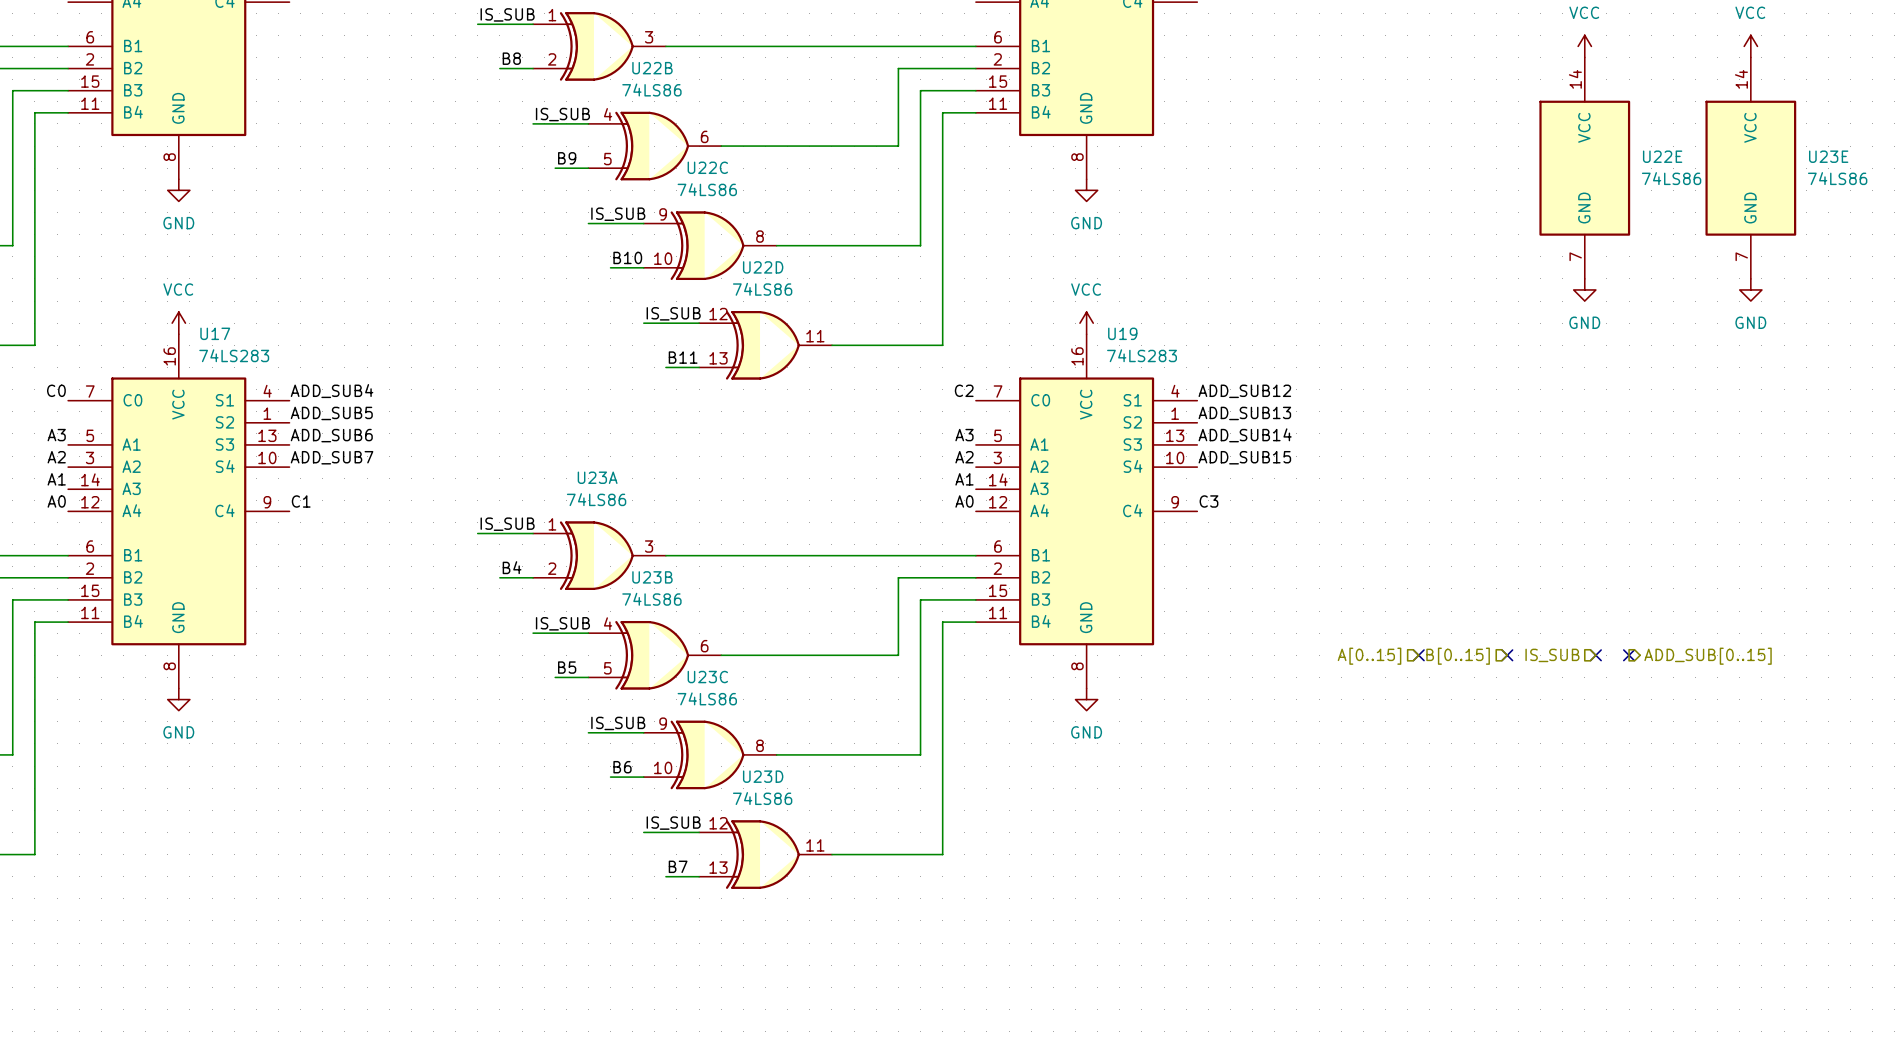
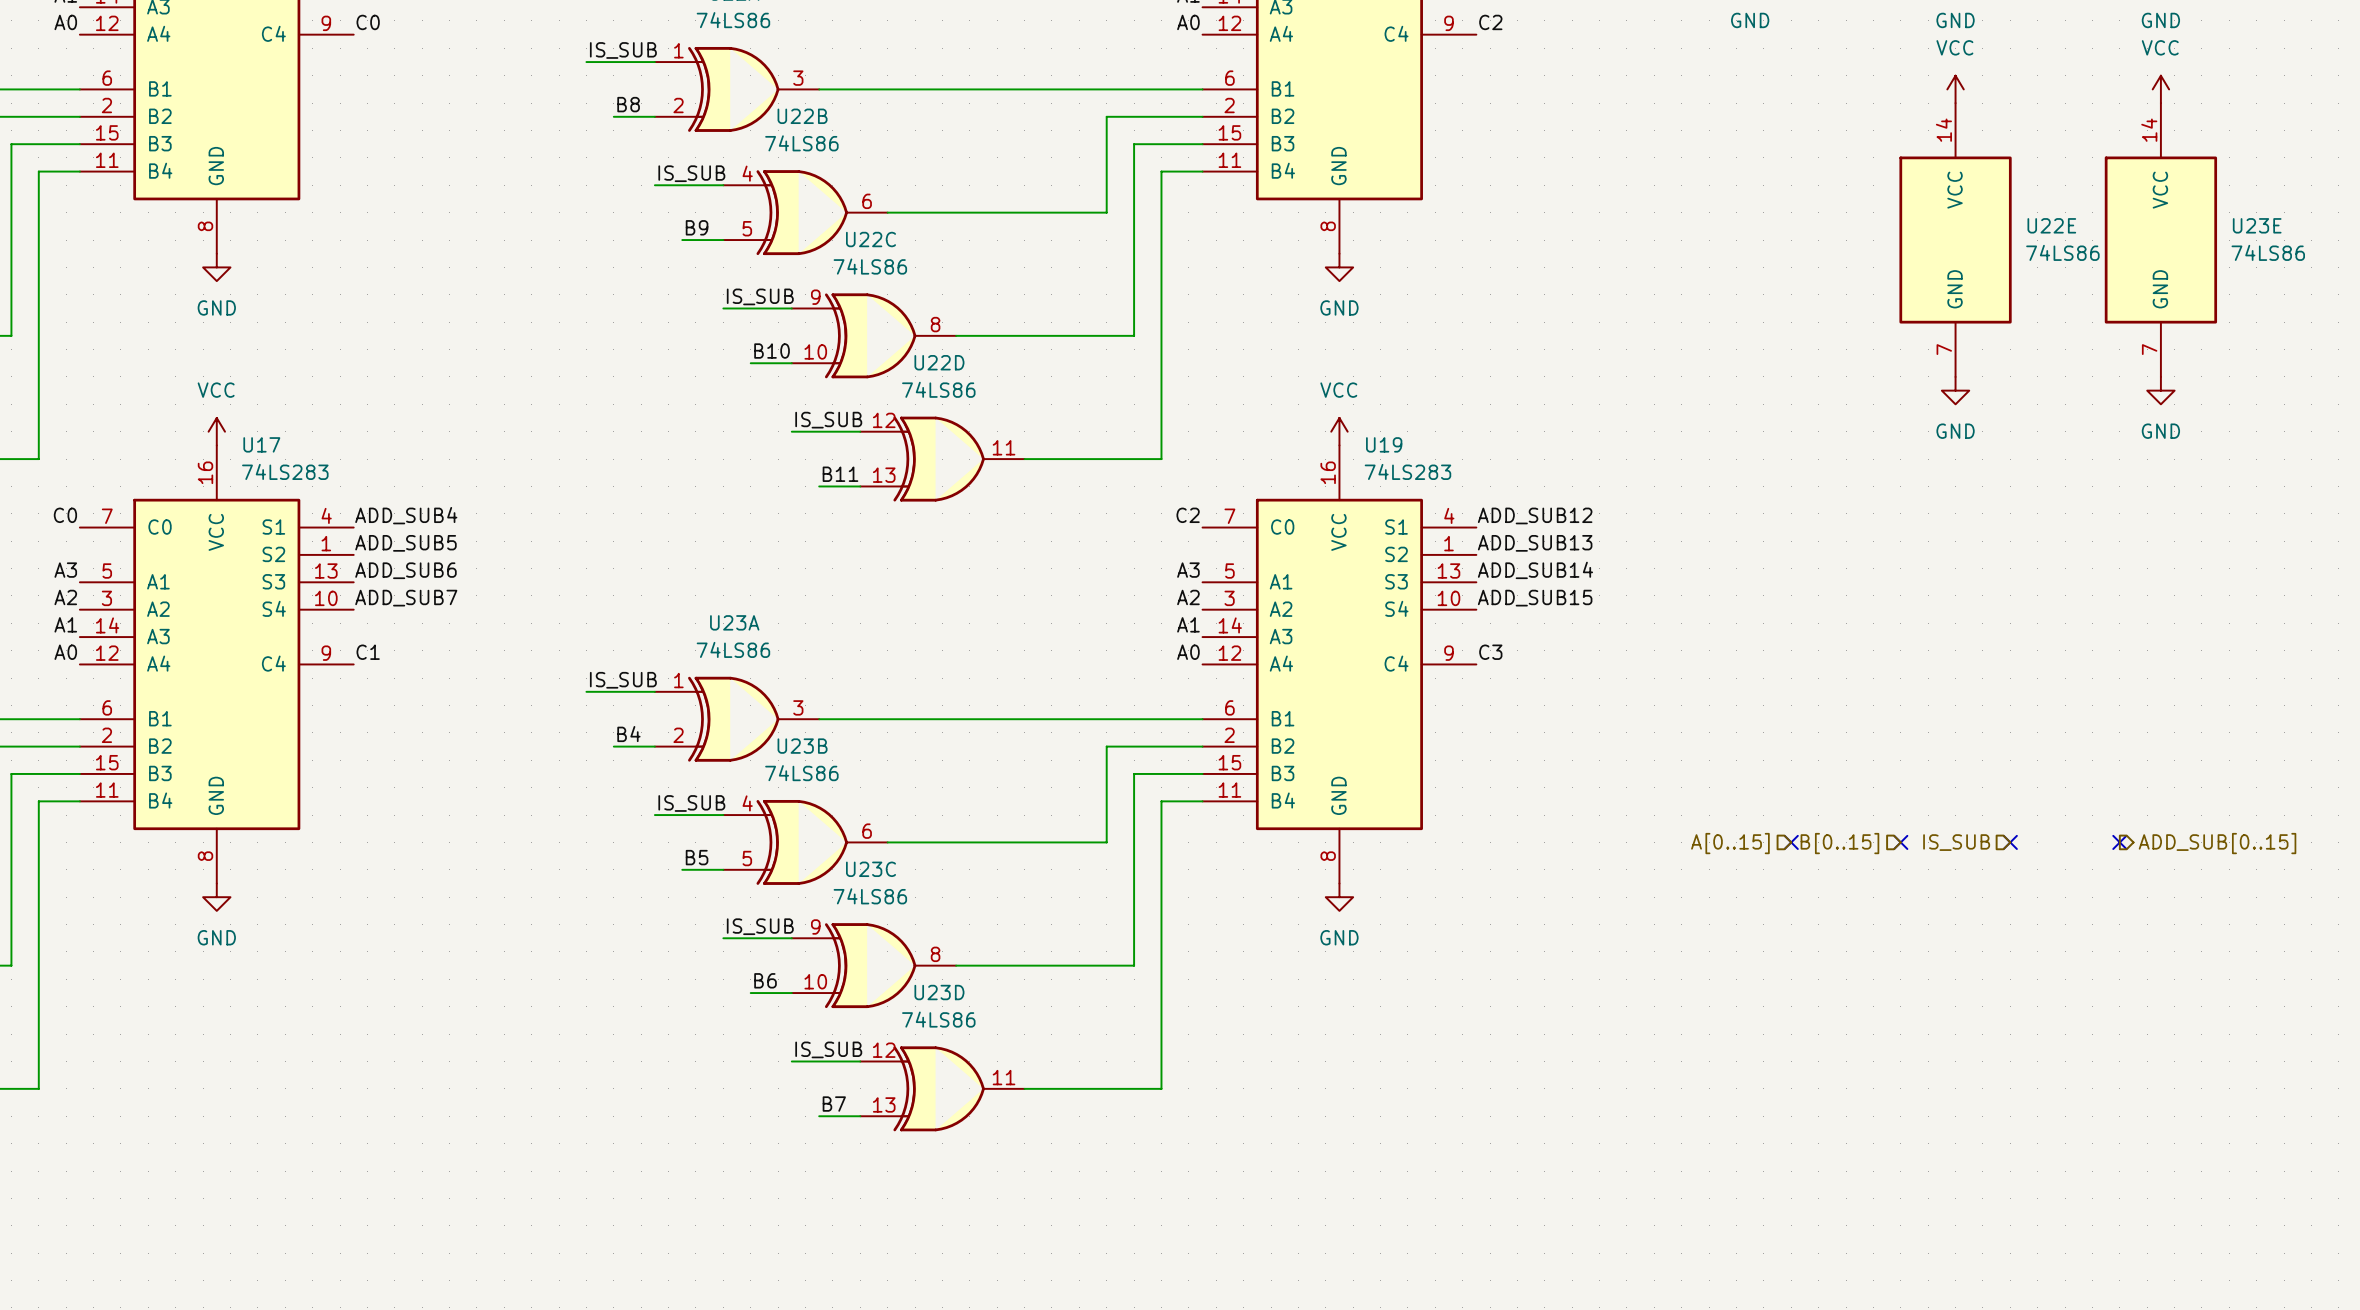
no-connect mark: (1418, 655) -> none
no-connect mark: none -> (1791, 842)
no-connect mark: (1507, 655) -> none
no-connect mark: none -> (1900, 842)
hierarchical label position: IS_SUB (1552, 655) -> IS_SUB (1956, 842)
no-connect mark: (1595, 655) -> none
no-connect mark: none -> (2119, 842)
hierarchical label position: A[0..15] (1369, 656) -> A[0..15] (1730, 843)
hierarchical label position: B[0..15] (1458, 656) -> B[0..15] (1839, 843)
hierarchical label position: ADD_SUB[0..15] (1708, 656) -> ADD_SUB[0..15] (2217, 843)

